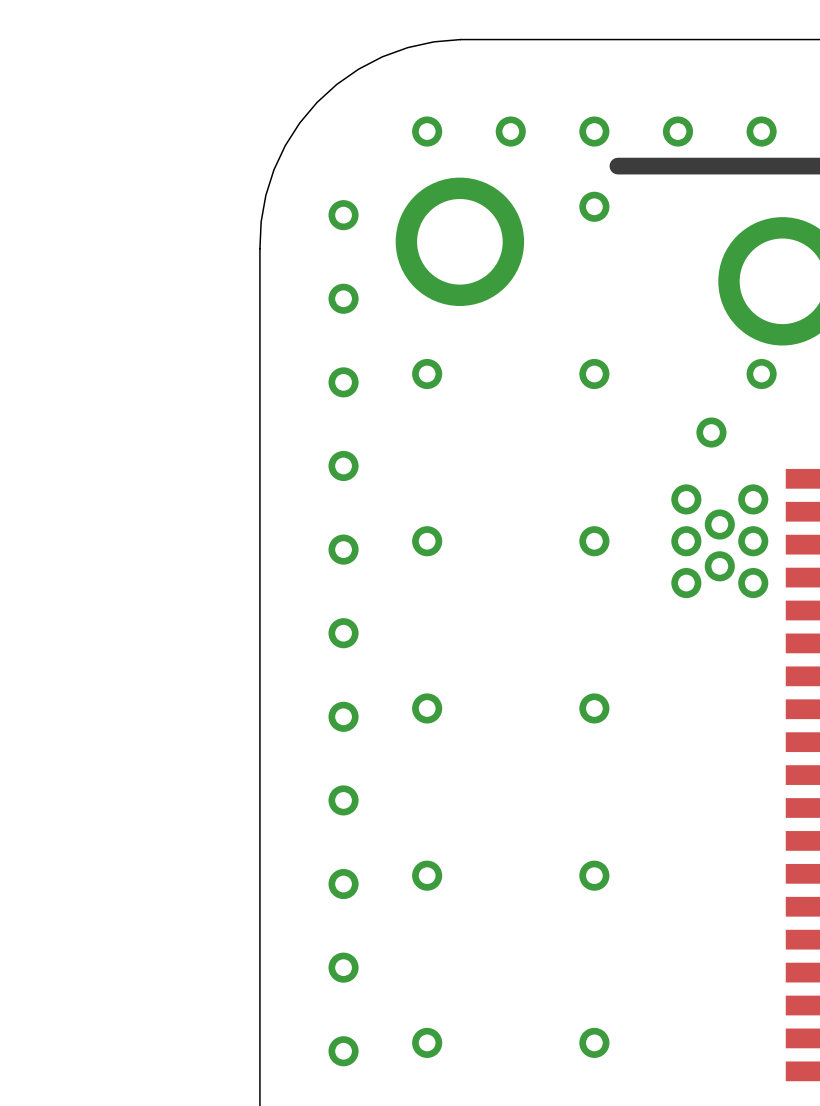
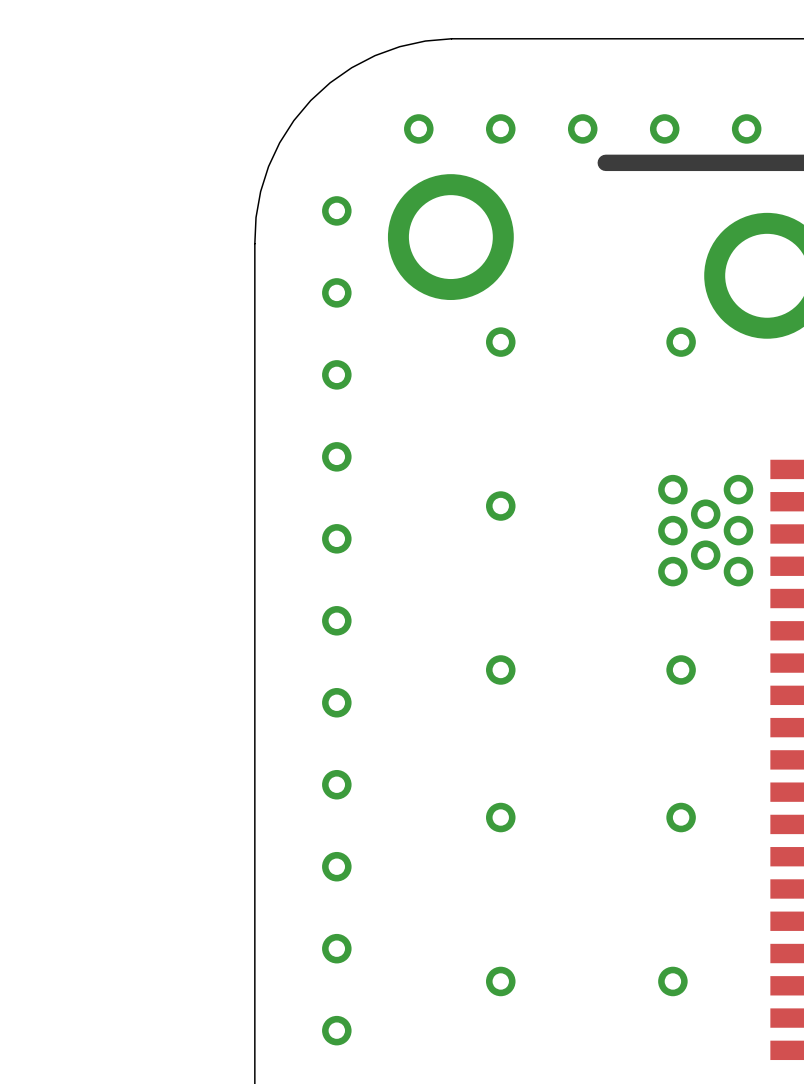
via: (594, 206) -> none
via: none -> (500, 342)
via: none -> (681, 342)
via: (427, 374) -> none
via: (594, 374) -> none
via: (761, 374) -> none
via: (711, 432) -> none
via: none -> (500, 506)
via: (427, 541) -> none
via: (594, 541) -> none
via: none -> (500, 669)
via: none -> (681, 669)
via: (427, 708) -> none
via: (594, 708) -> none
via: none -> (500, 817)
via: none -> (681, 817)
via: (427, 875) -> none
via: (594, 875) -> none
via: none -> (500, 981)
via: none -> (672, 981)
via: (427, 1042) -> none
via: (594, 1042) -> none

